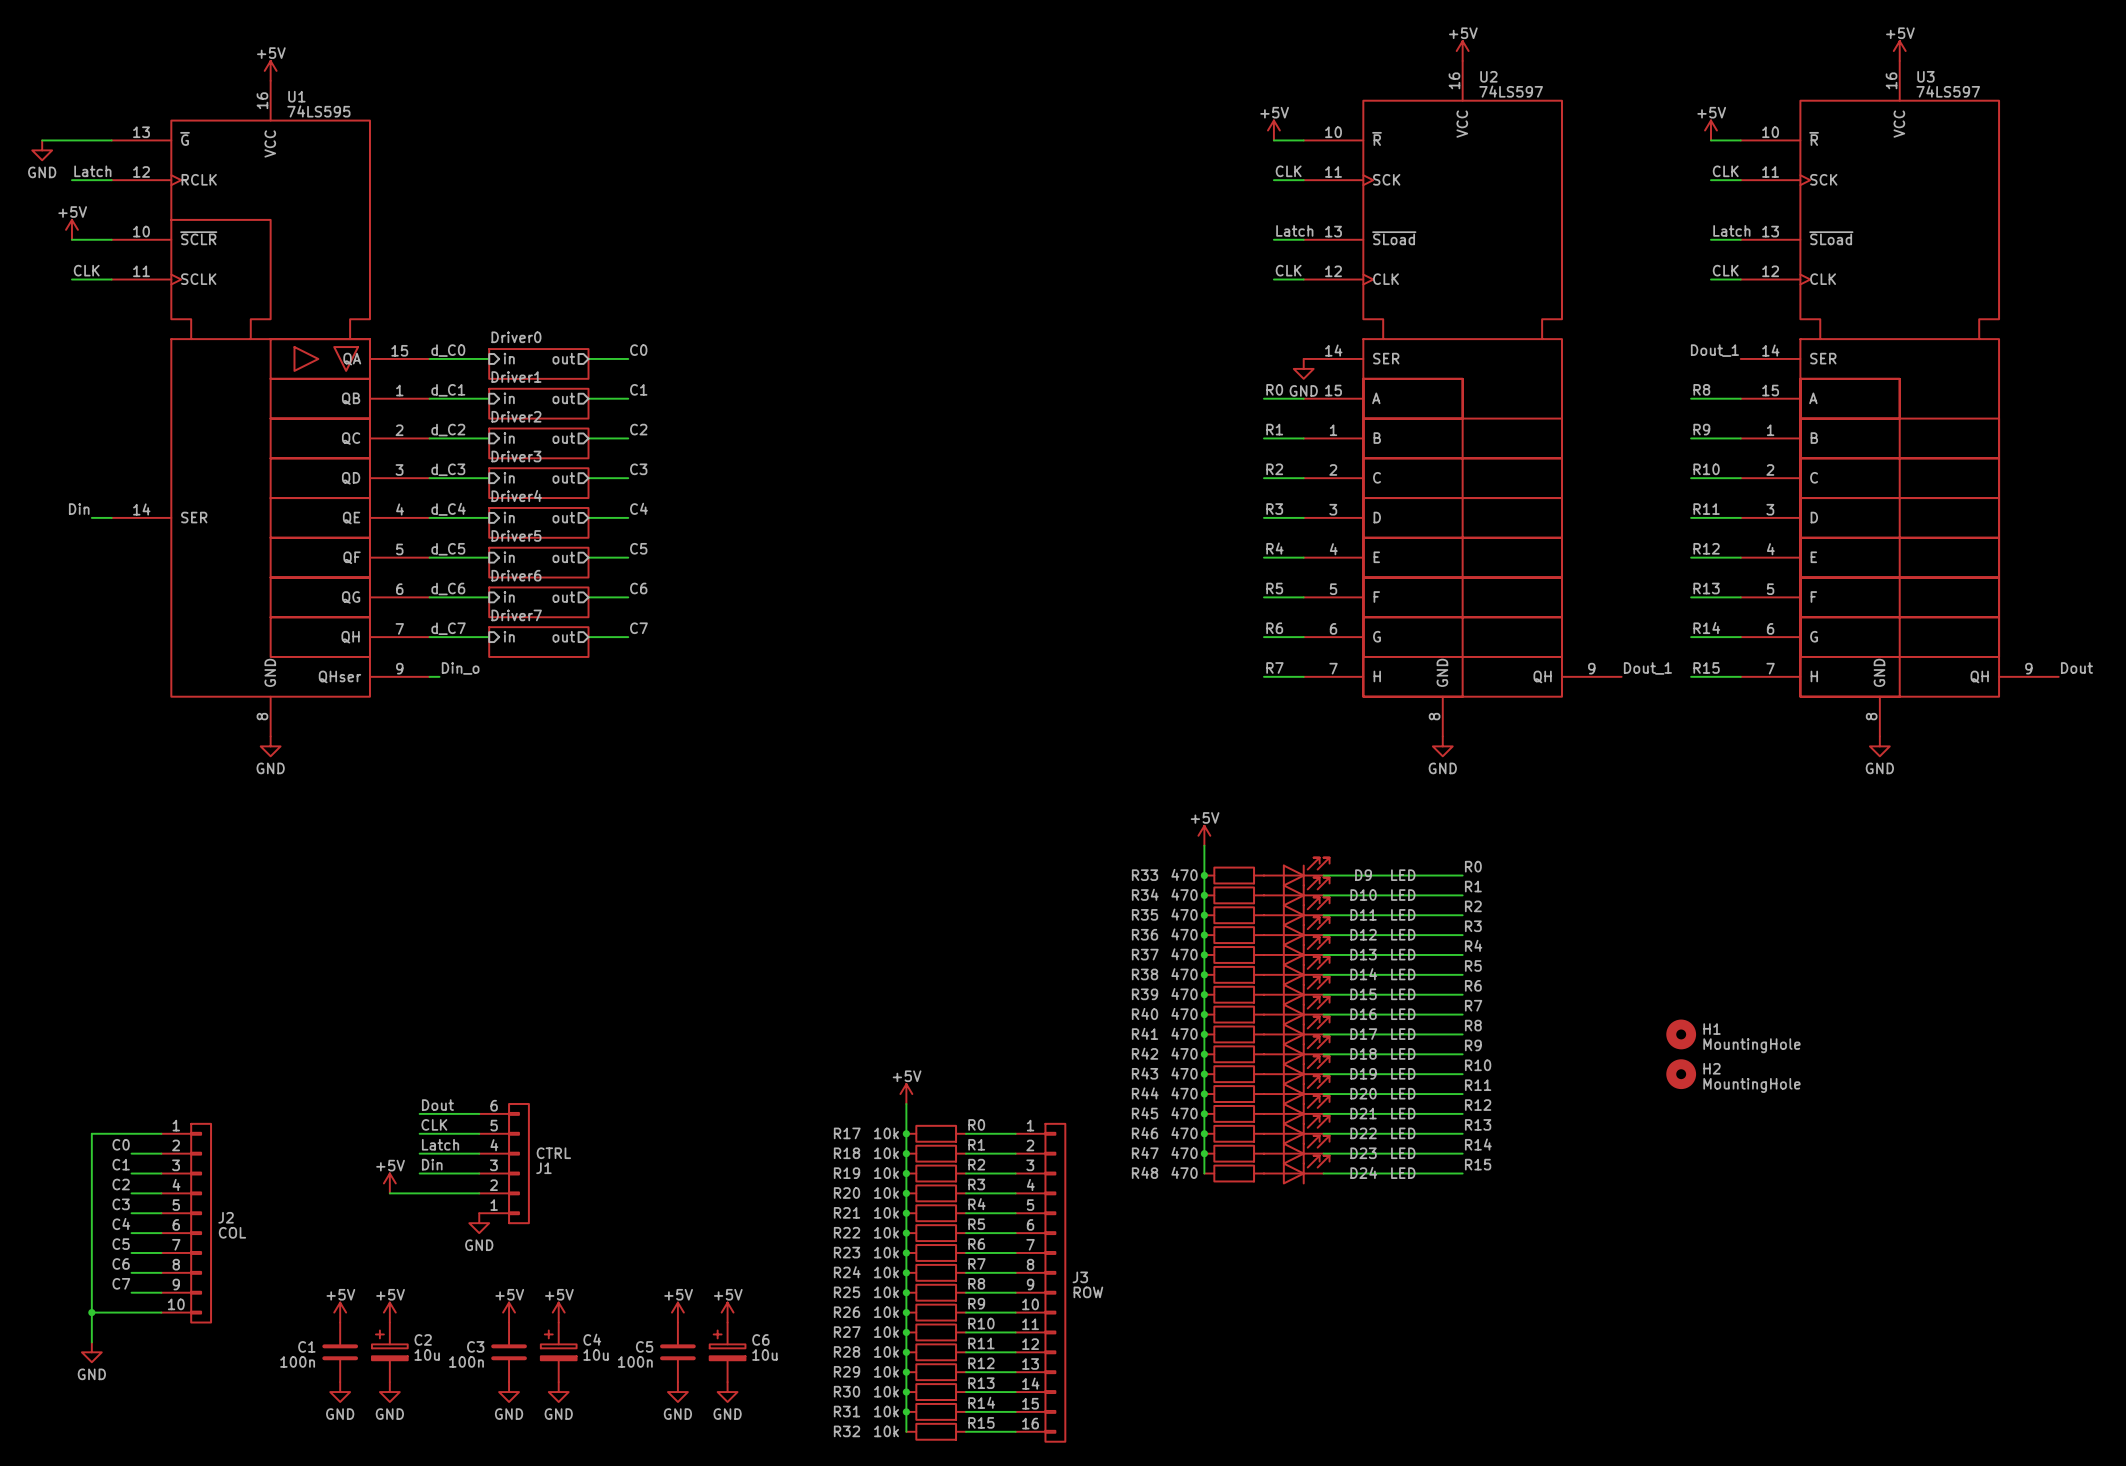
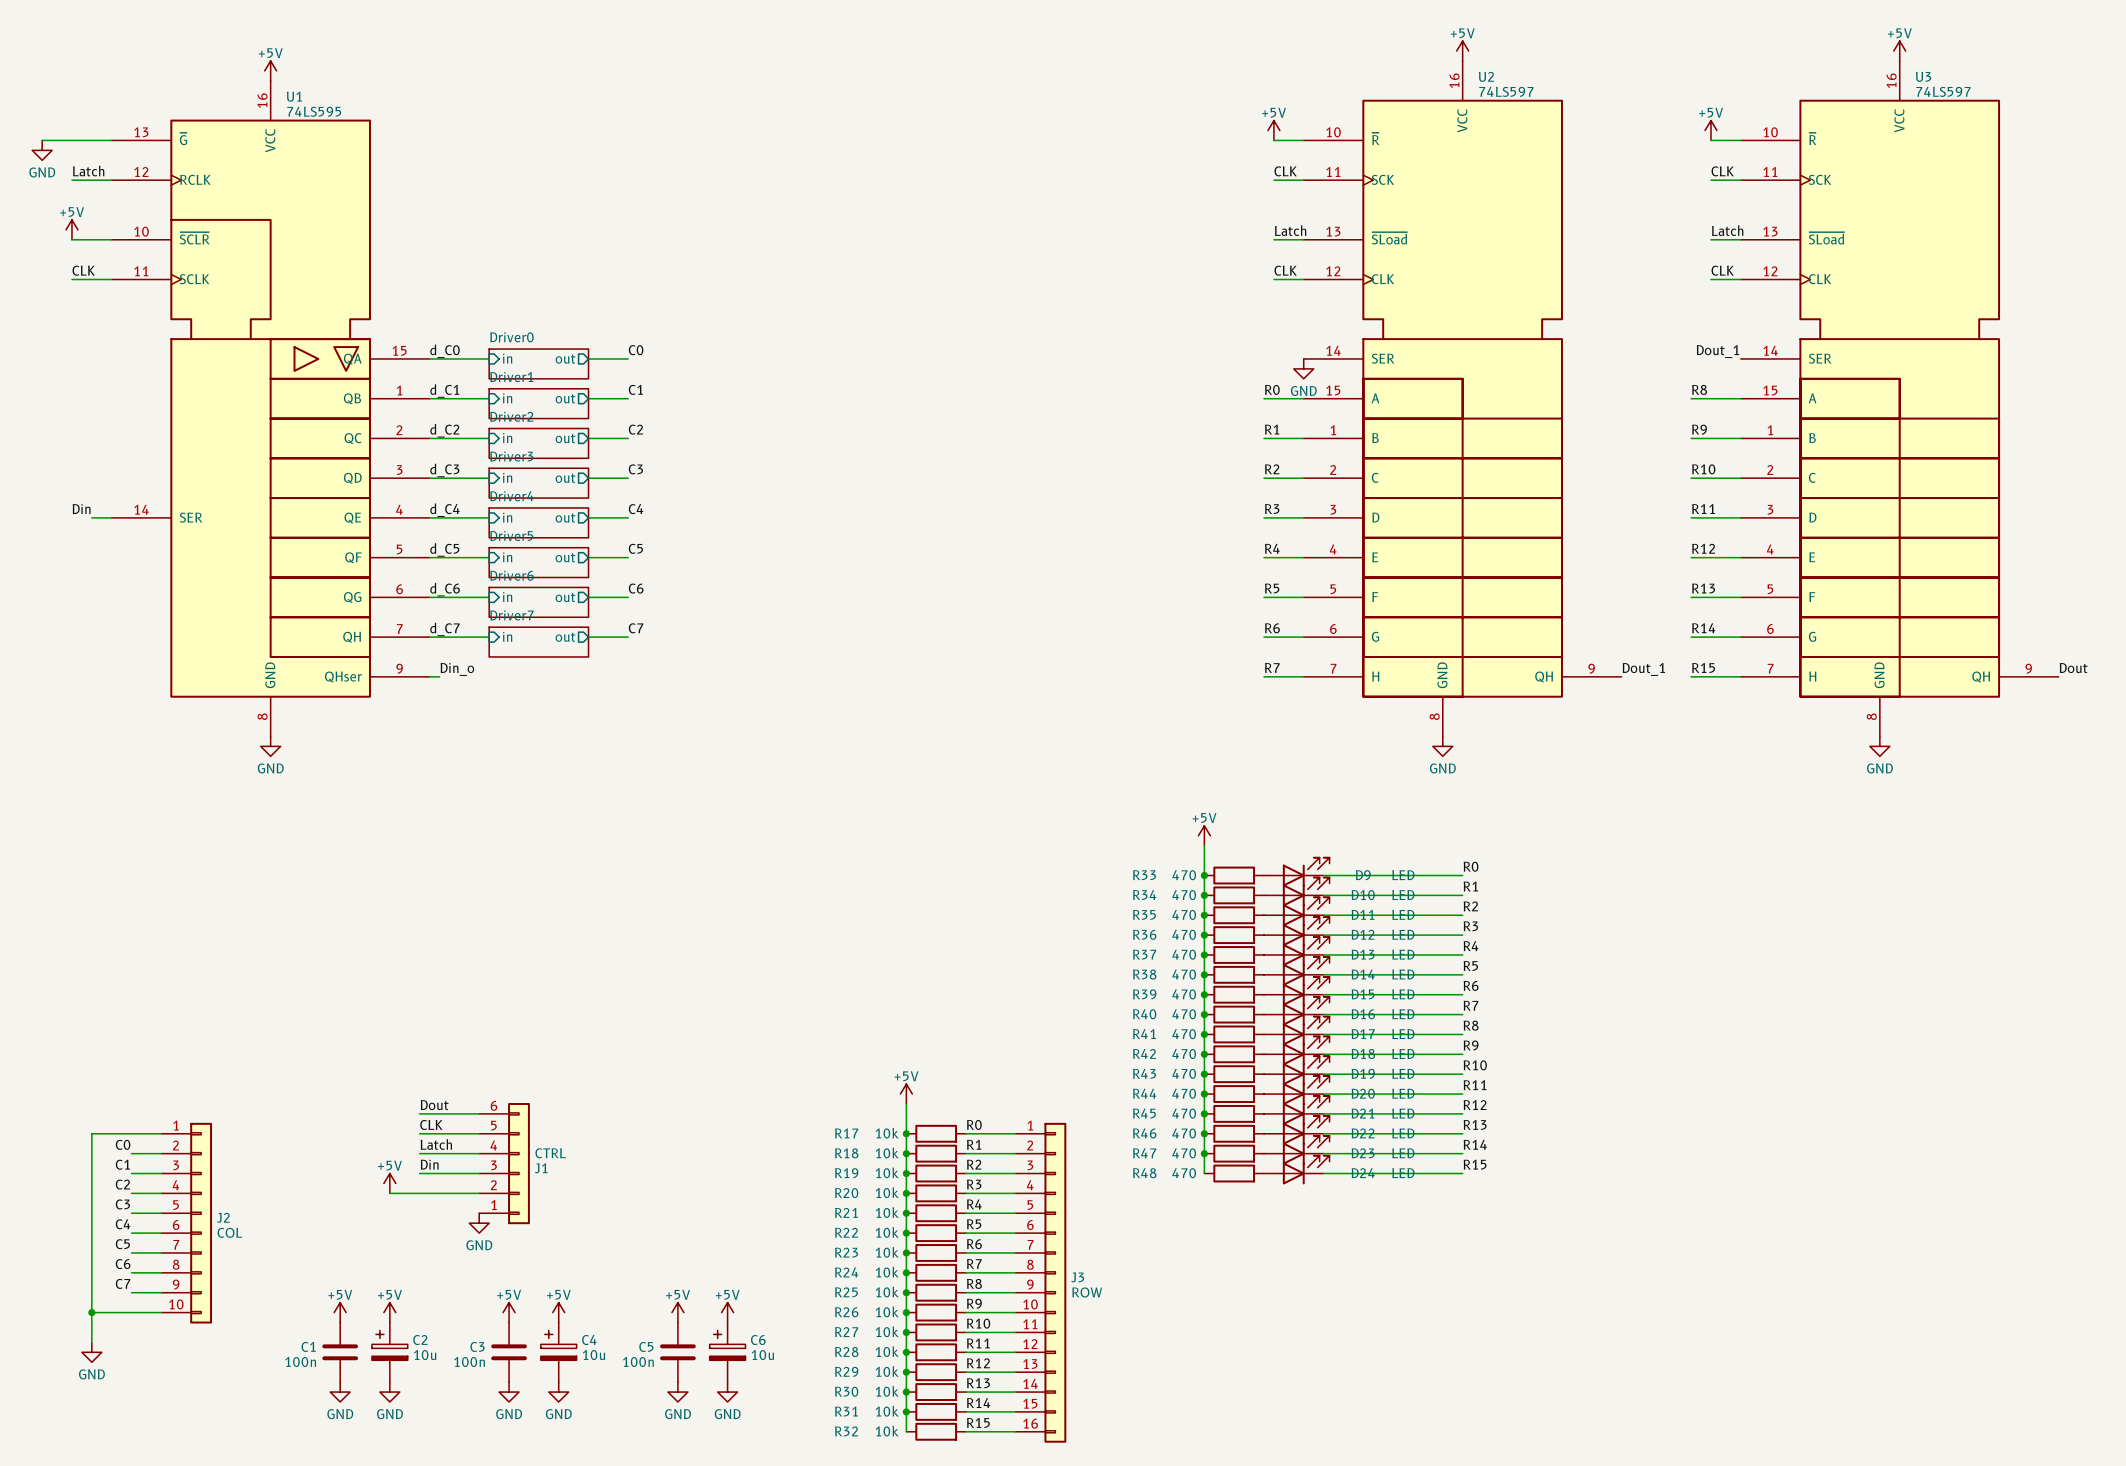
H1: MountingHole (1681, 1034) -> none
H2: MountingHole (1681, 1074) -> none

